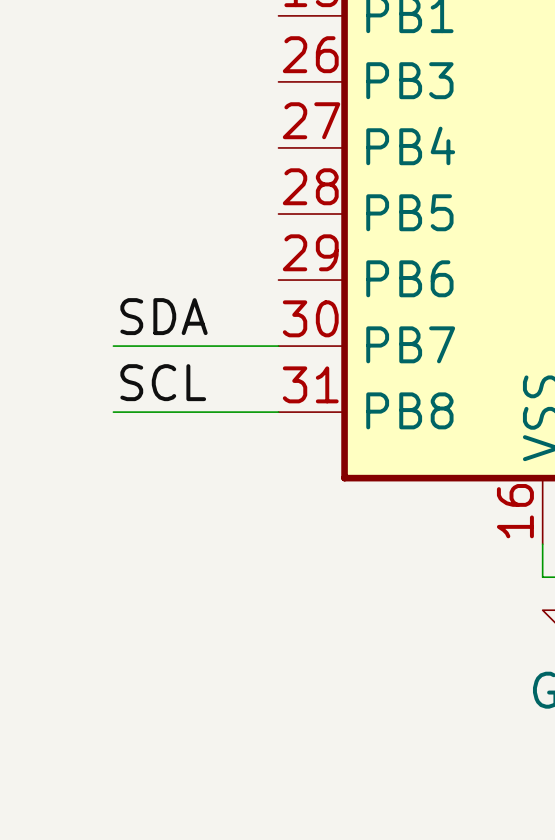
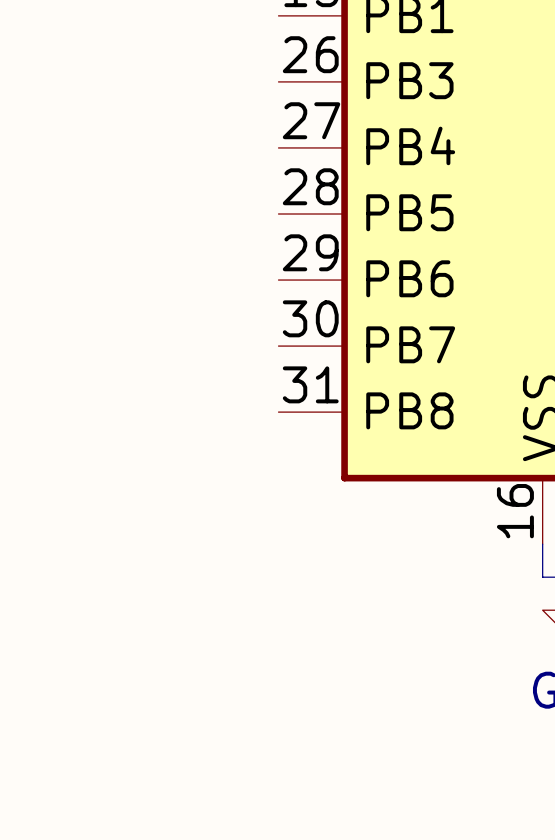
label: SDA (164, 316) -> none
wire: (113, 346) (278, 346) -> none
label: SCL (163, 382) -> none
wire: (113, 412) (278, 412) -> none

